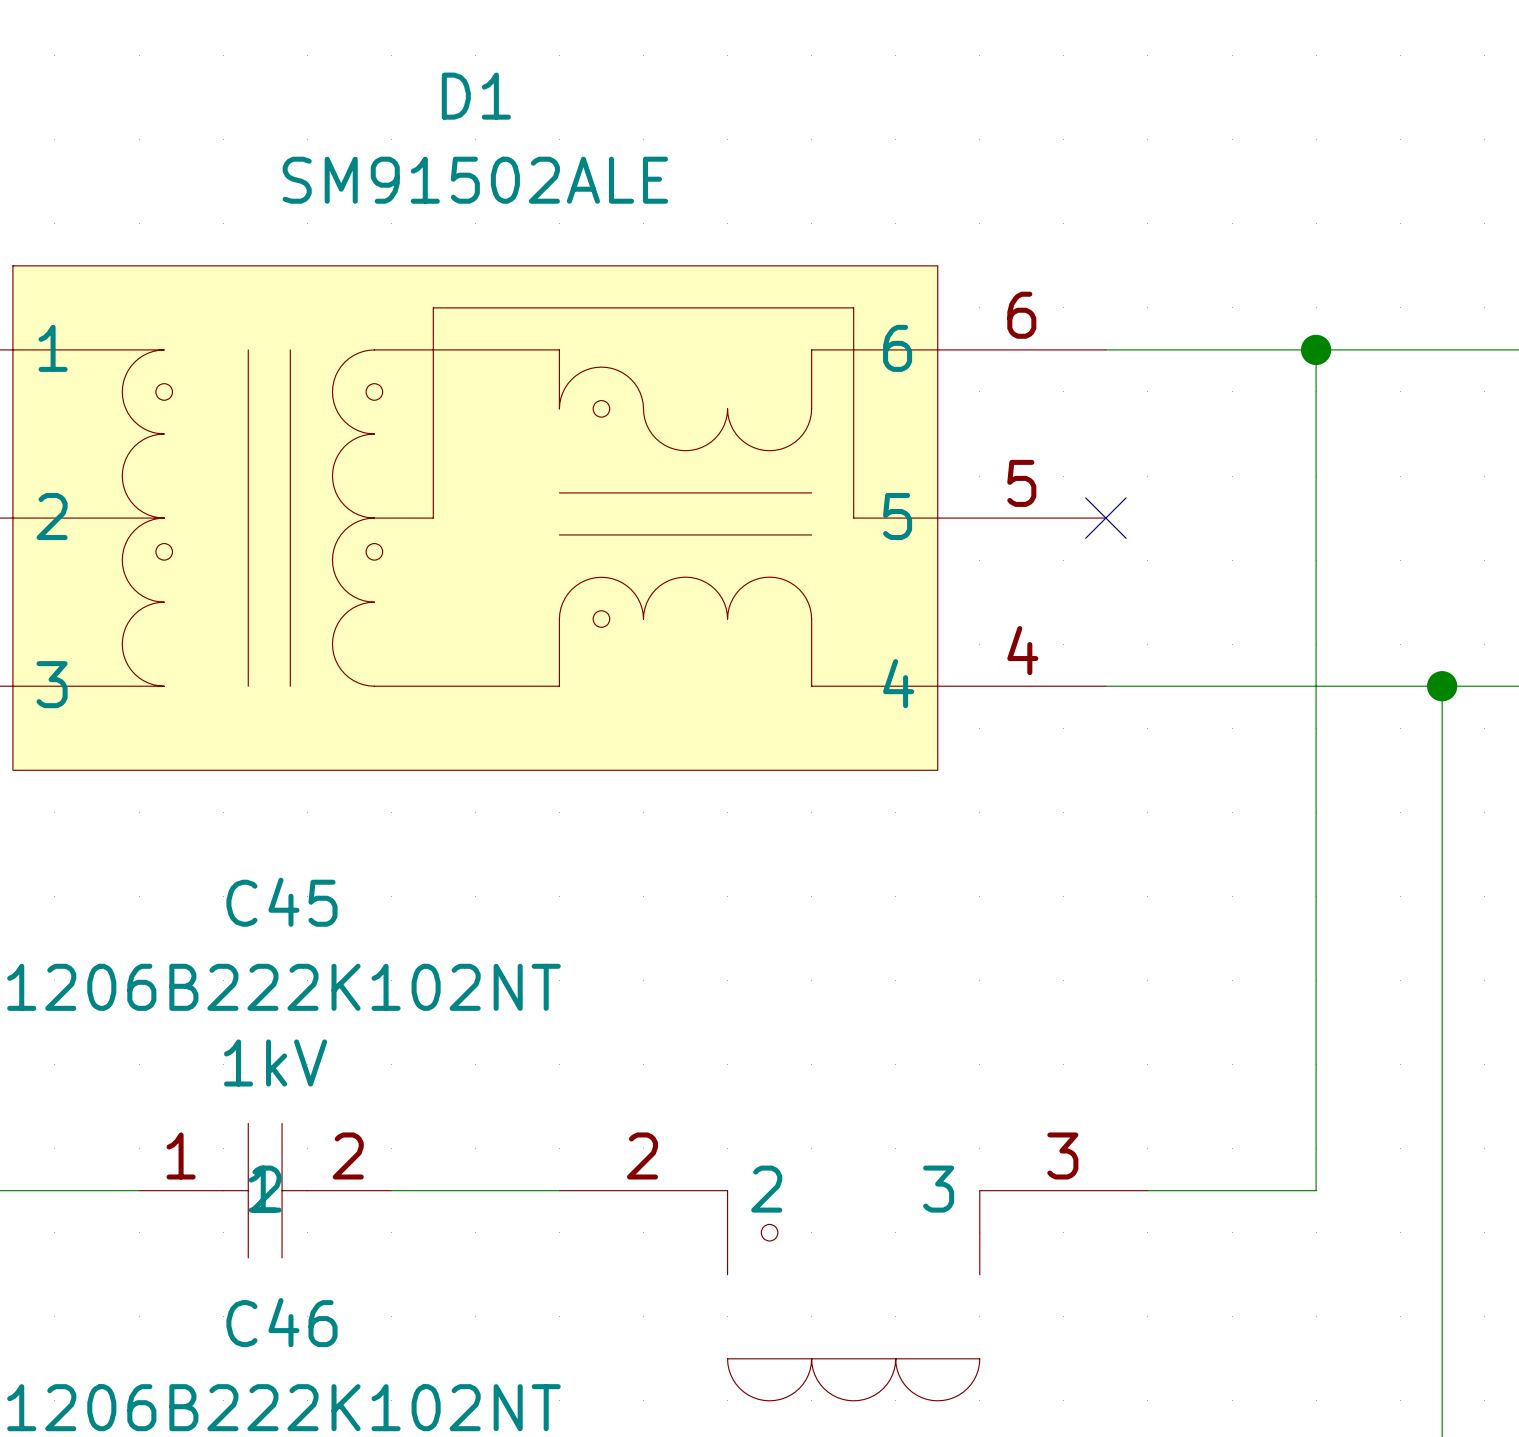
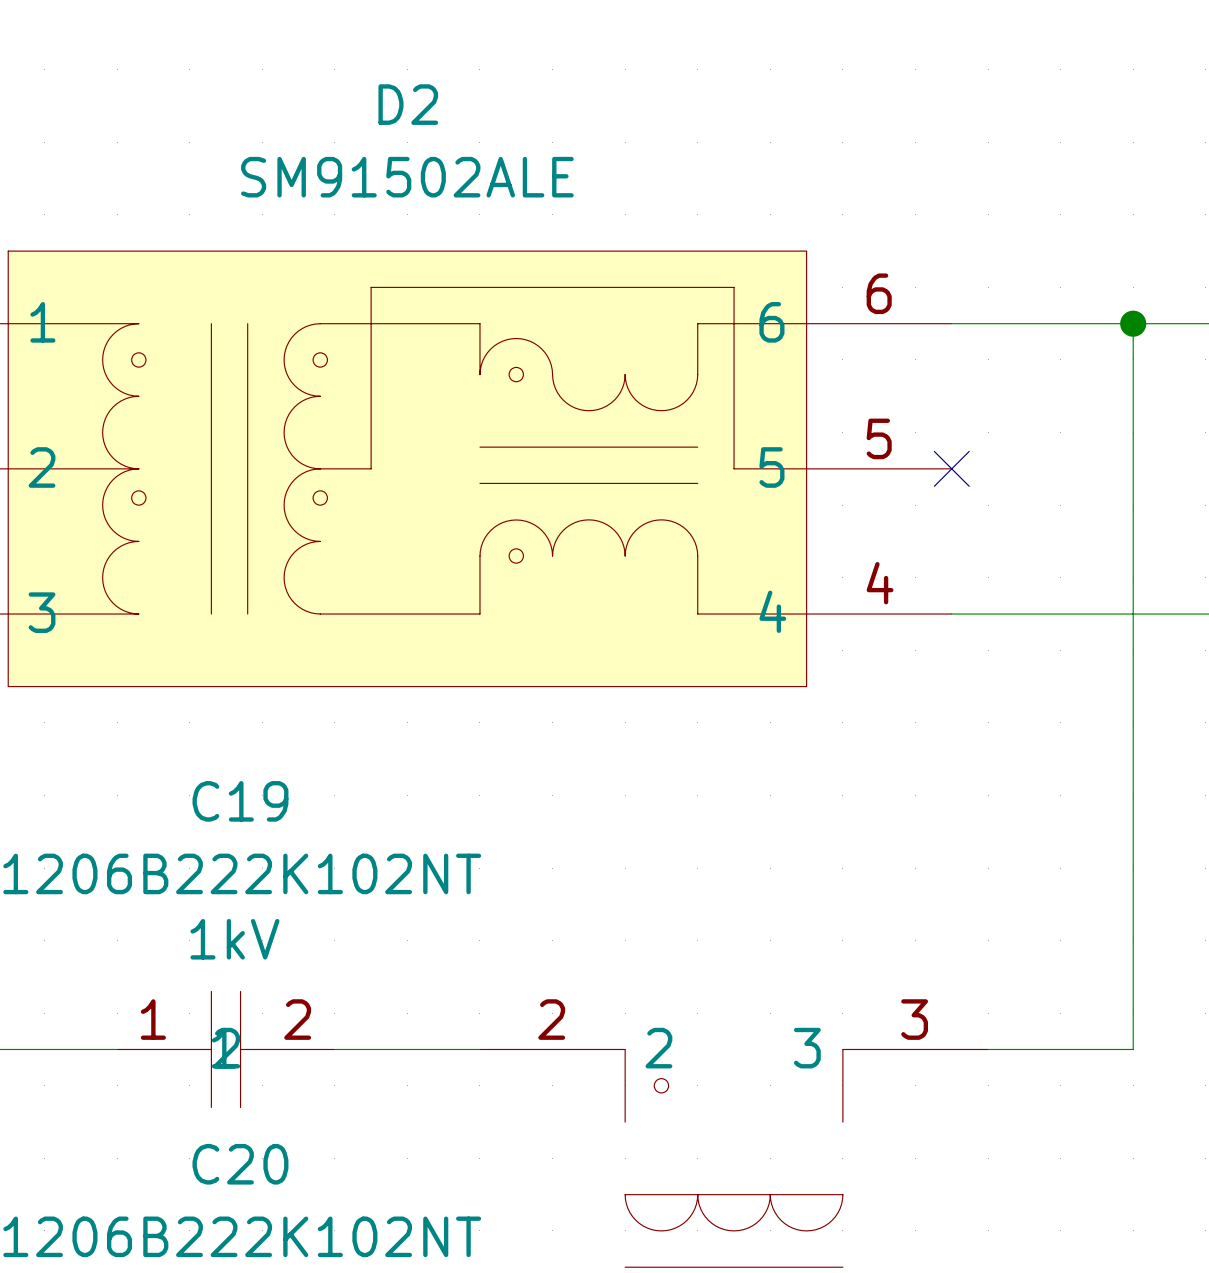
D1 name: D1 (476, 96) -> D2 (408, 104)
C45 name: C45 (281, 902) -> C19 (240, 801)
C46 name: C46 (281, 1322) -> C20 (240, 1164)

